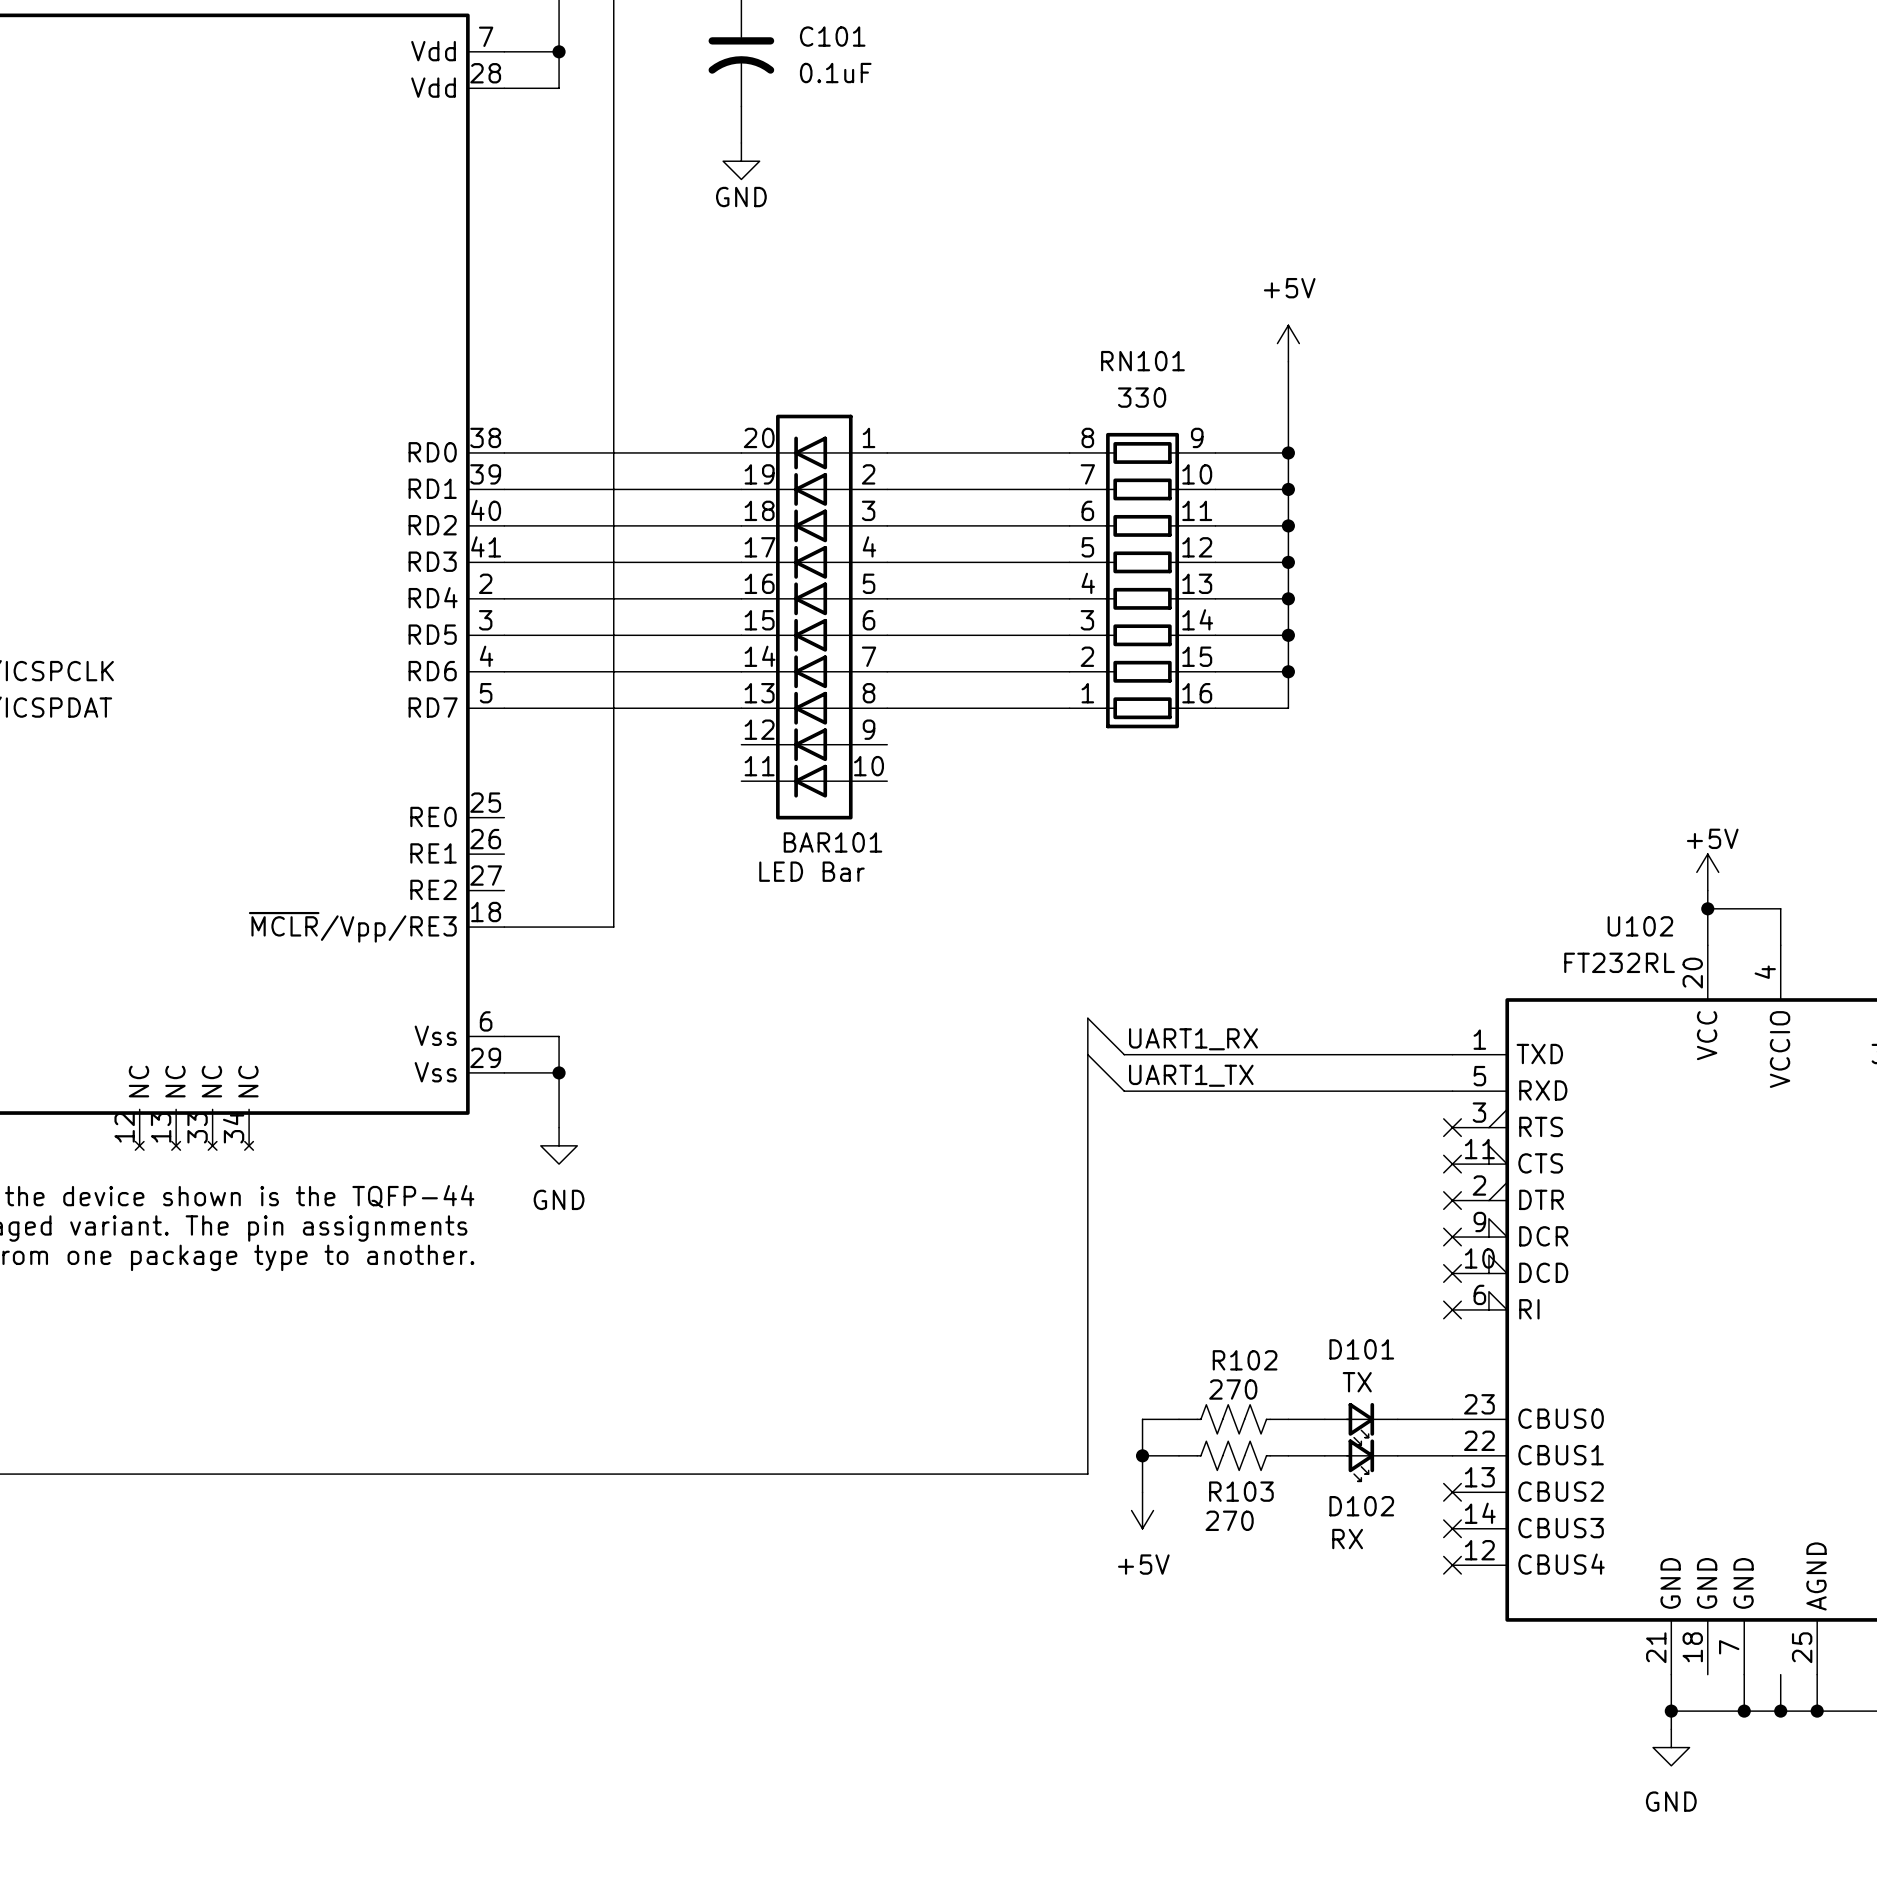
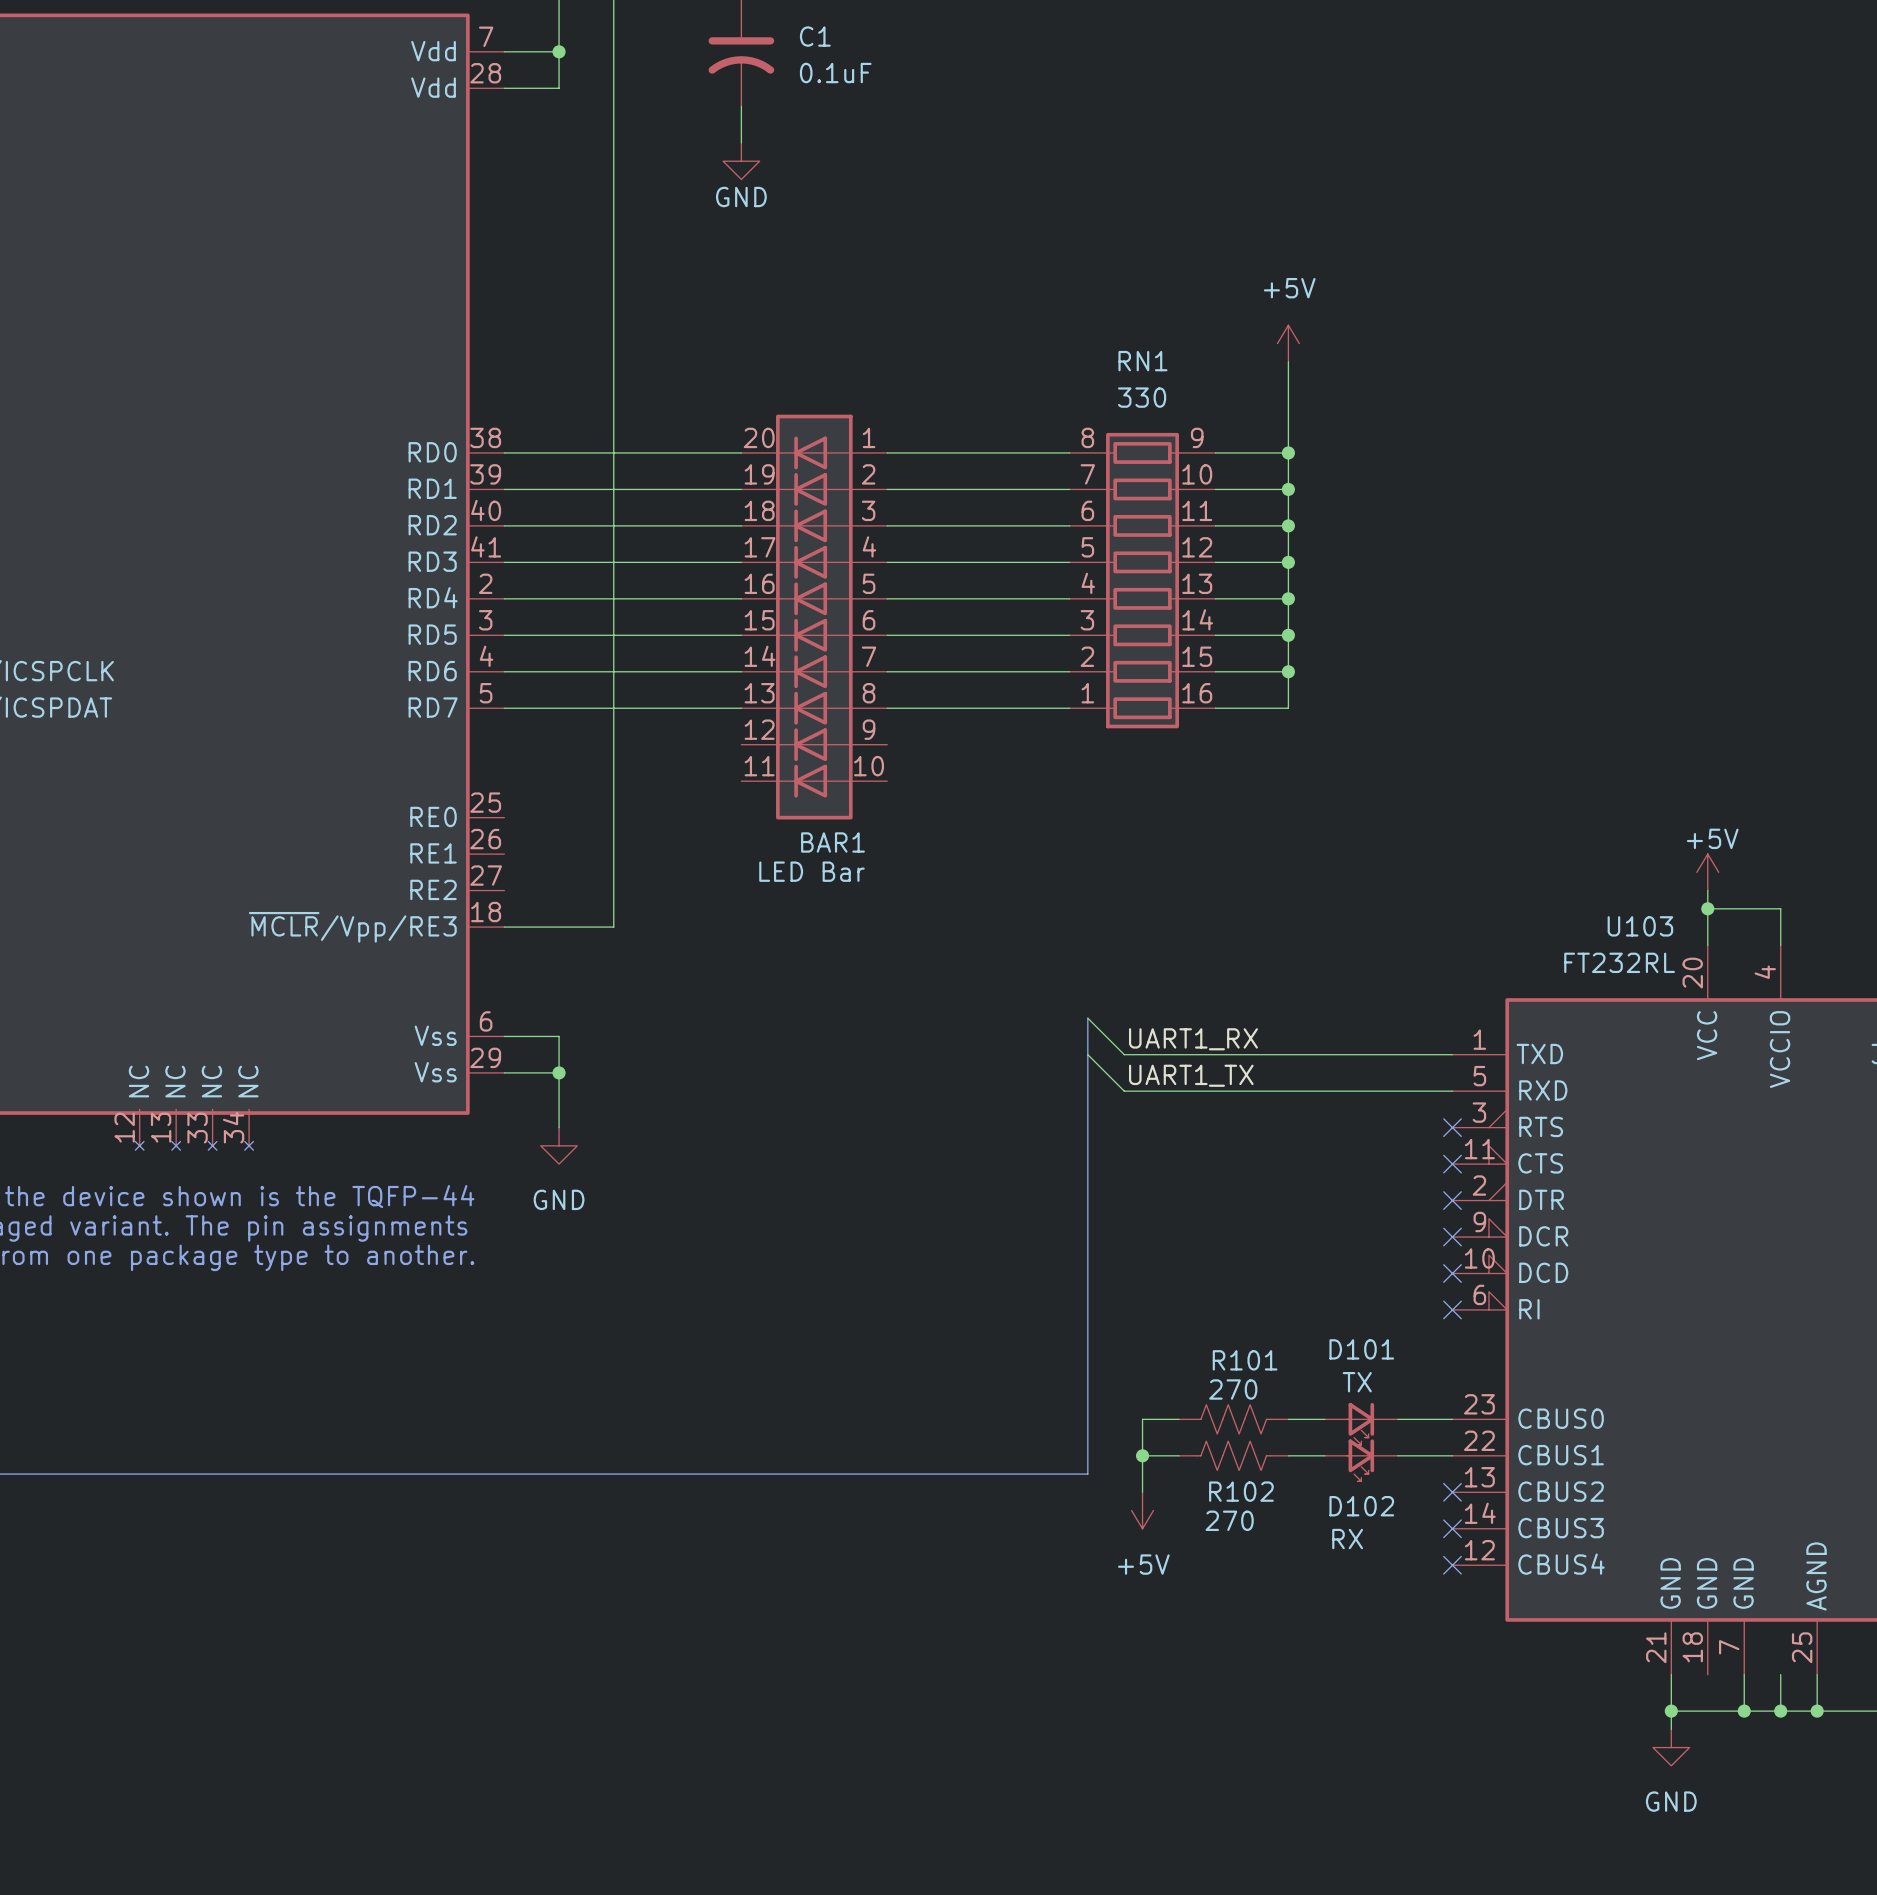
C101 name: C101 (832, 36) -> C1 (815, 36)
RN101 name: RN101 (1142, 361) -> RN1 (1142, 361)
BAR101 name: BAR101 (832, 842) -> BAR1 (832, 842)
U102 name: U102 (1640, 926) -> U103 (1640, 926)
R102 name: R102 (1245, 1360) -> R101 (1245, 1360)
R103 name: R103 (1241, 1491) -> R102 (1241, 1491)

